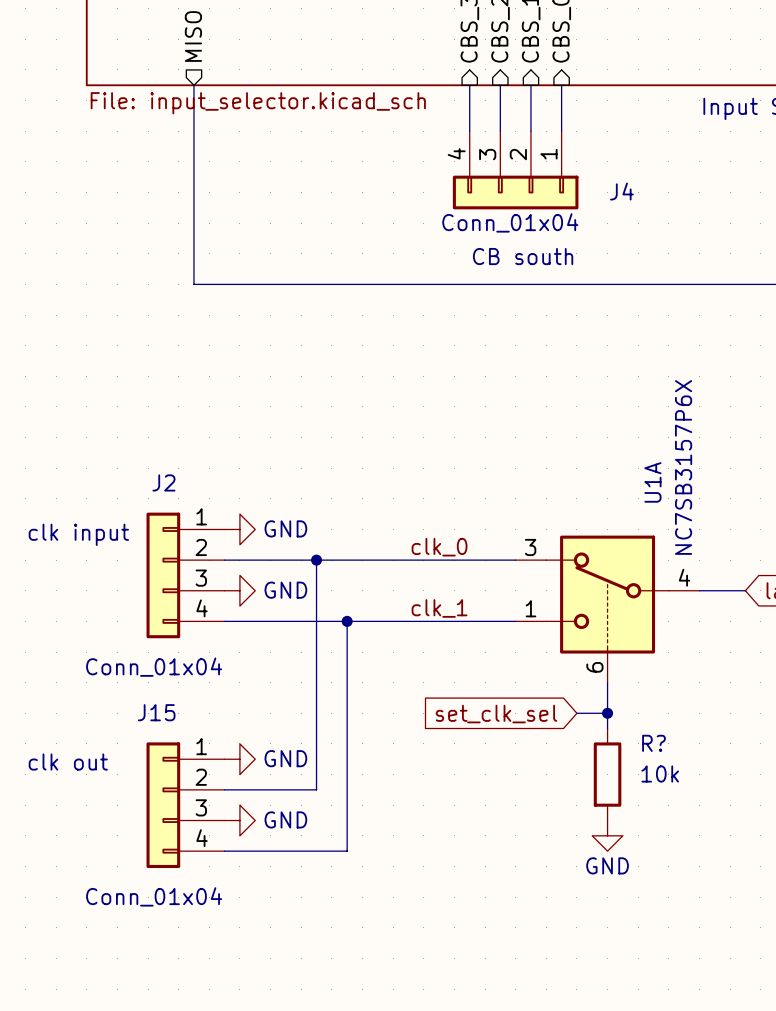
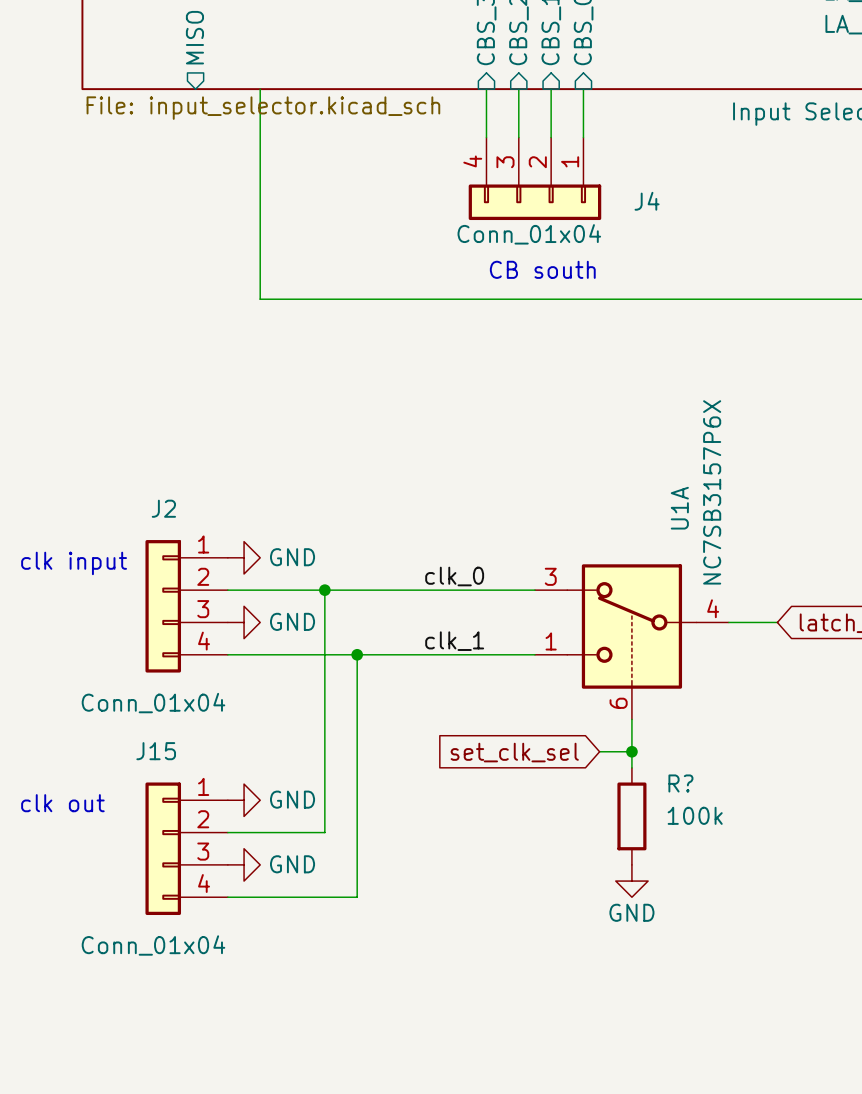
wire: (193, 85) (193, 284) (255, 284) -> (260, 89) (260, 299)
R? value: 10k (660, 773) -> 100k (695, 815)

